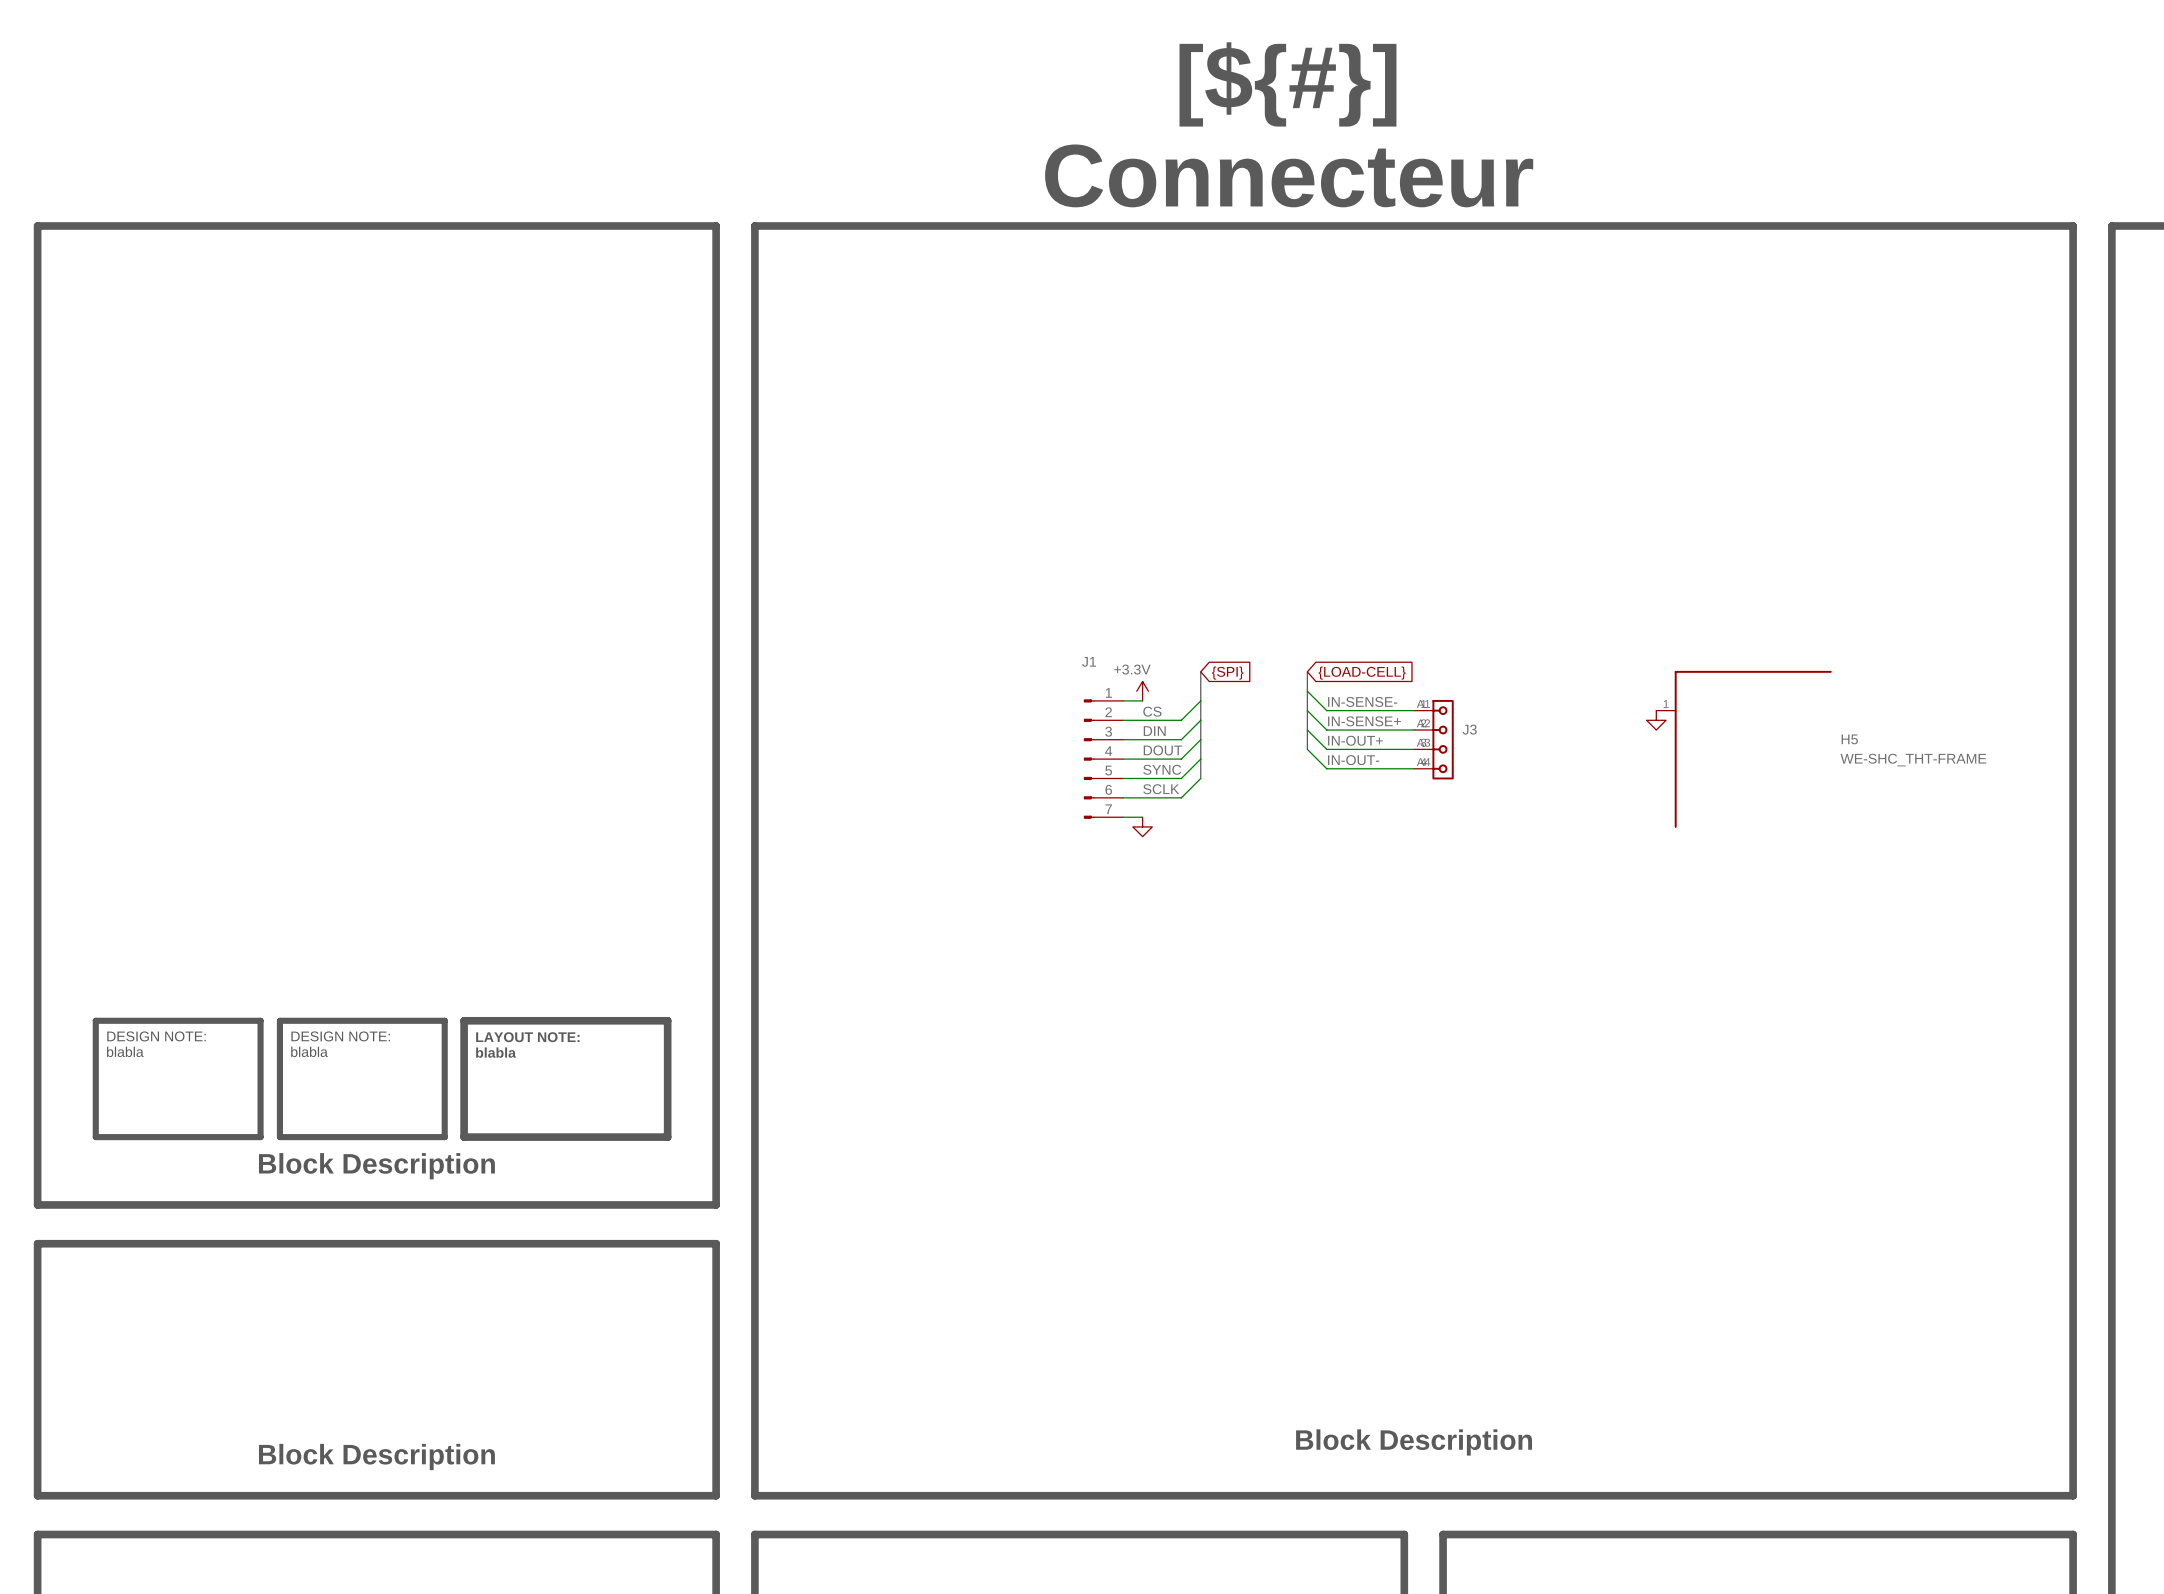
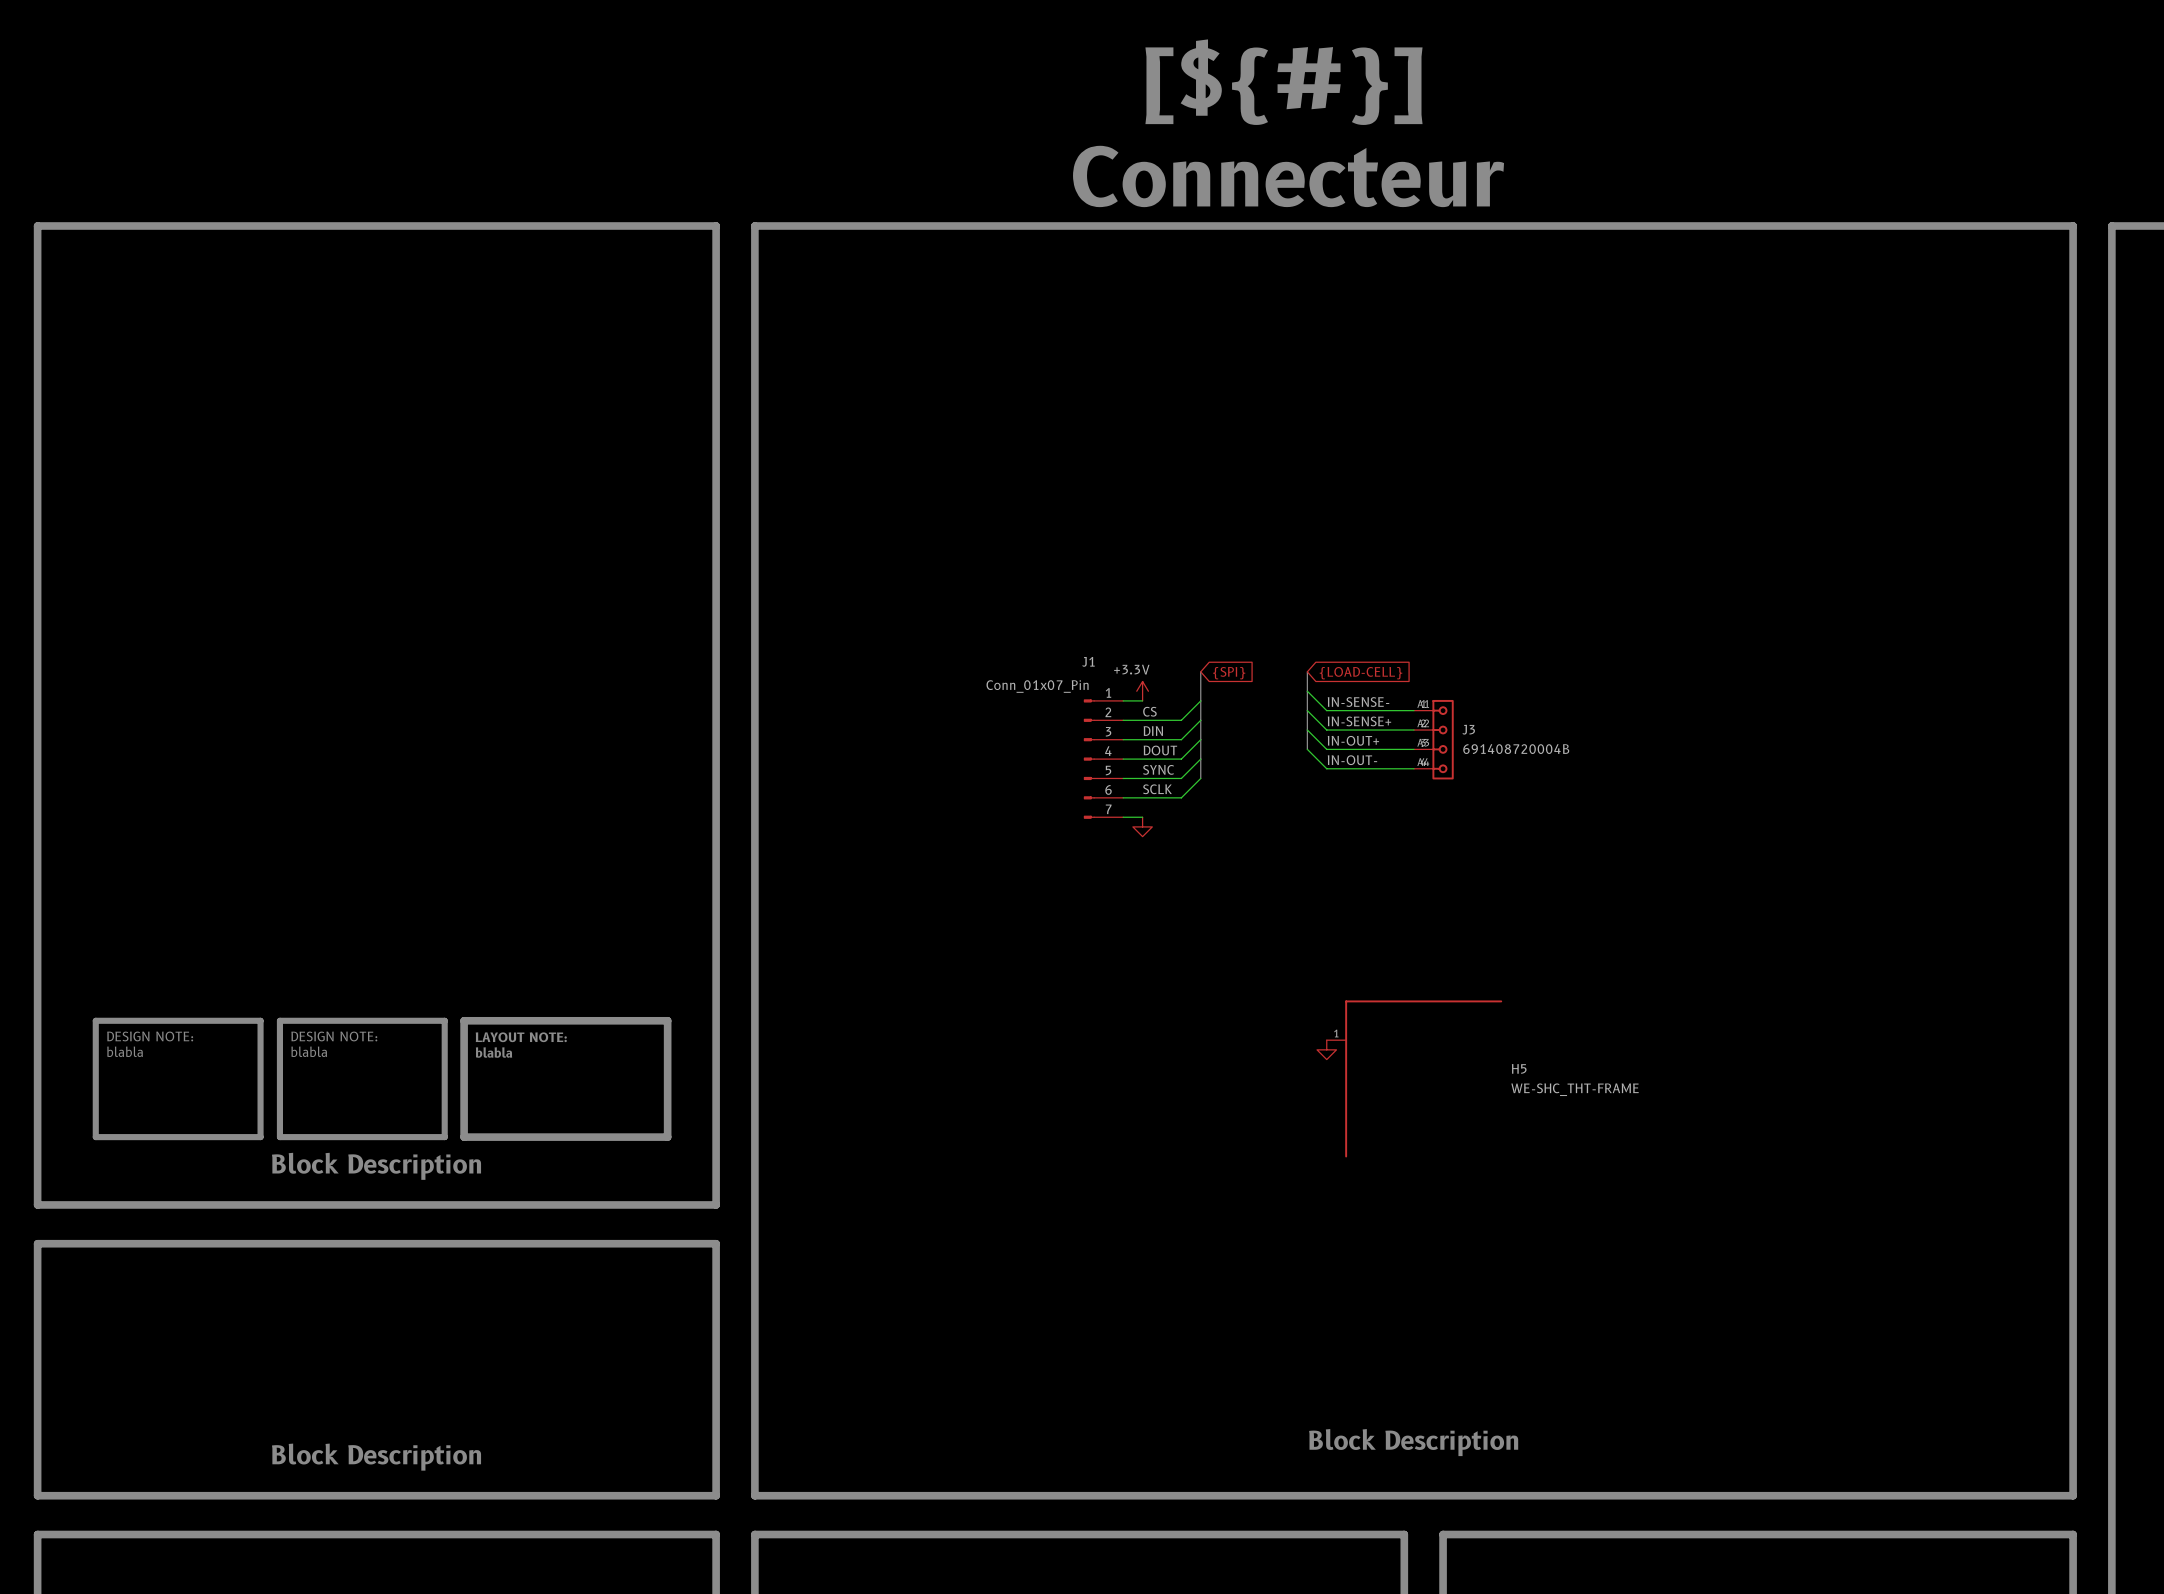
J1 value: none -> Conn_01x07_Pin (1037, 686)
power symbol: (1656, 720) -> none
J3 value: none -> 691408720004B (1516, 749)
H5 position: (1744, 749) -> (1414, 1078)
power symbol: none -> (1326, 1049)

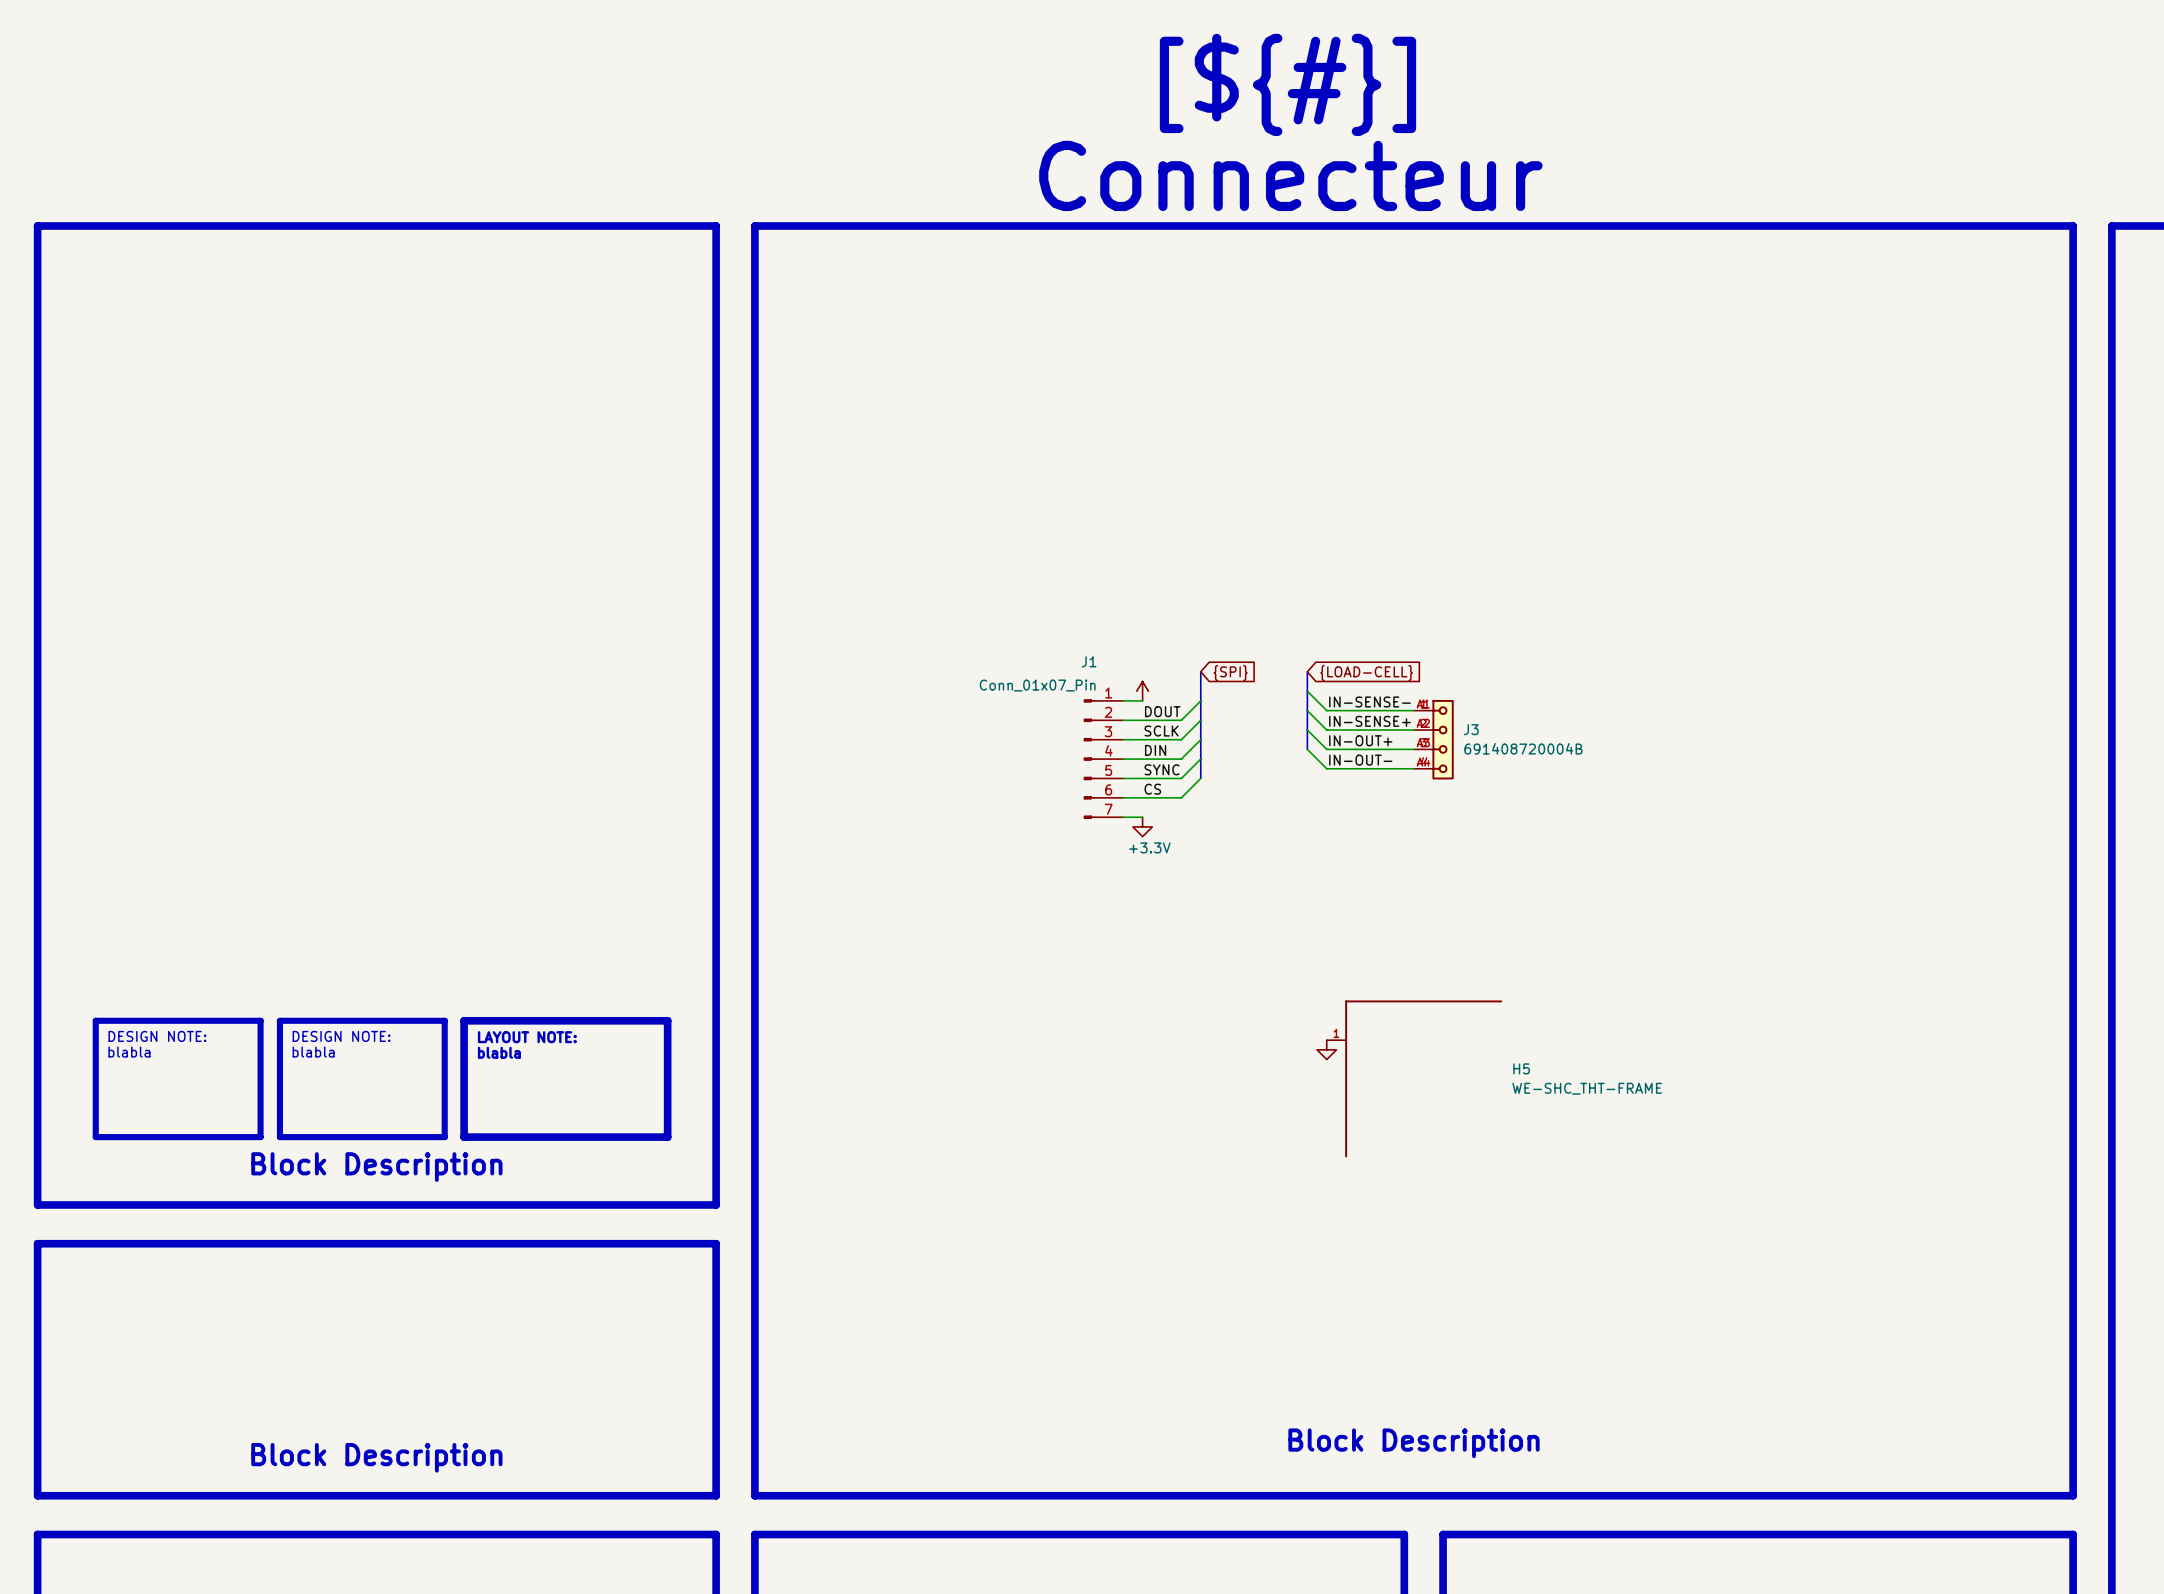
power symbol text: +3.3V (1131, 669) -> none
label: CS (1149, 711) -> DOUT (1162, 711)
label: DIN (1153, 731) -> SCLK (1161, 731)
label: DOUT (1160, 750) -> DIN (1155, 750)
label: SCLK (1157, 789) -> CS (1152, 789)
power symbol text: none -> +3.3V (1149, 847)

